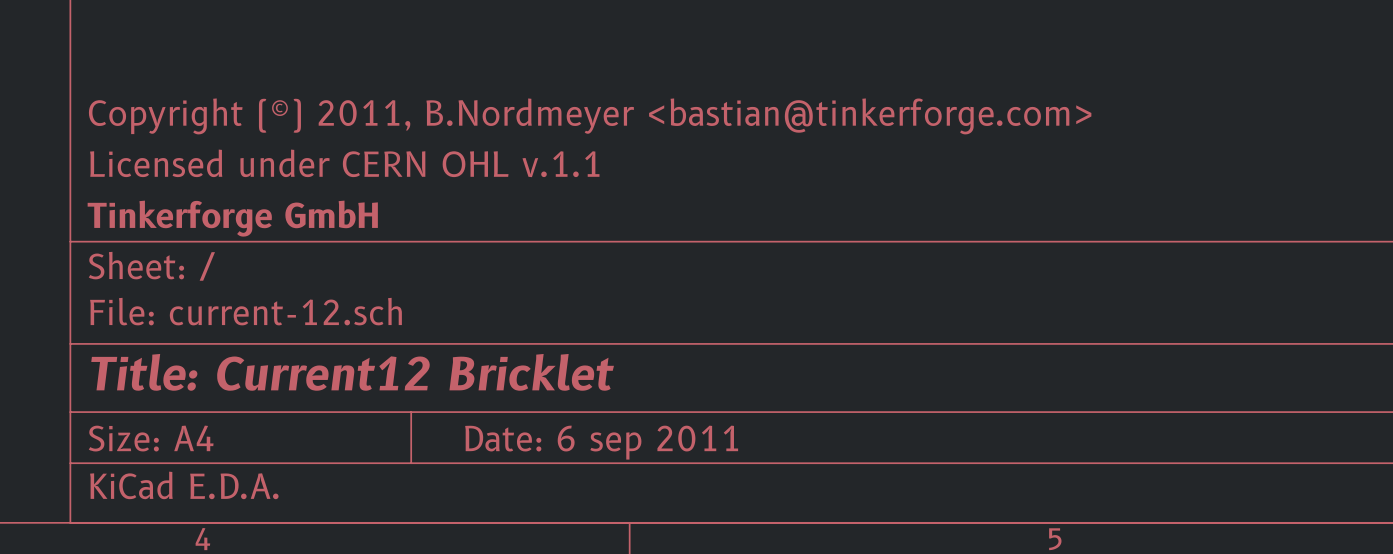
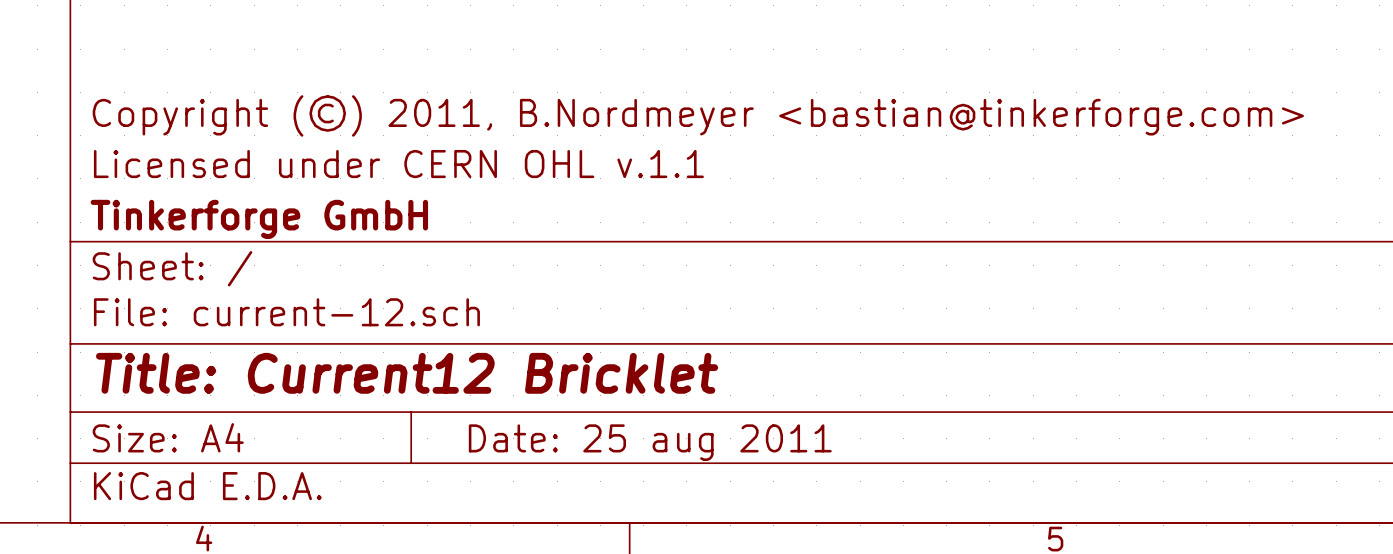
title block: Date: 6 sep 2011 (601, 442) -> Date: 25 aug 2011 (650, 442)

